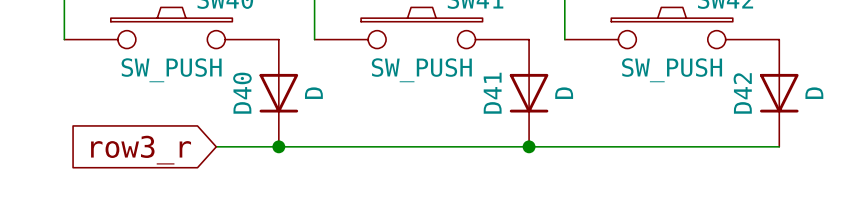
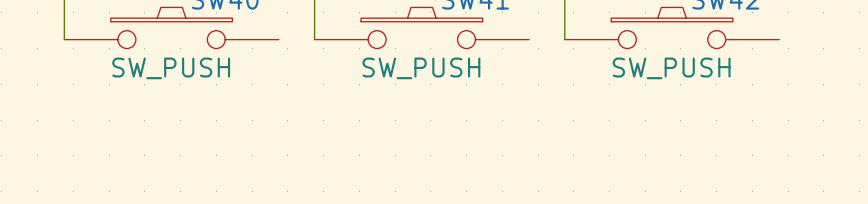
D40: D (278, 93) -> none
D41: D (529, 93) -> none
D42: D (779, 93) -> none
wire: (216, 146) (779, 146) -> none
junction: (278, 146) -> none
junction: (529, 146) -> none
global label: row3_r (141, 150) -> none

